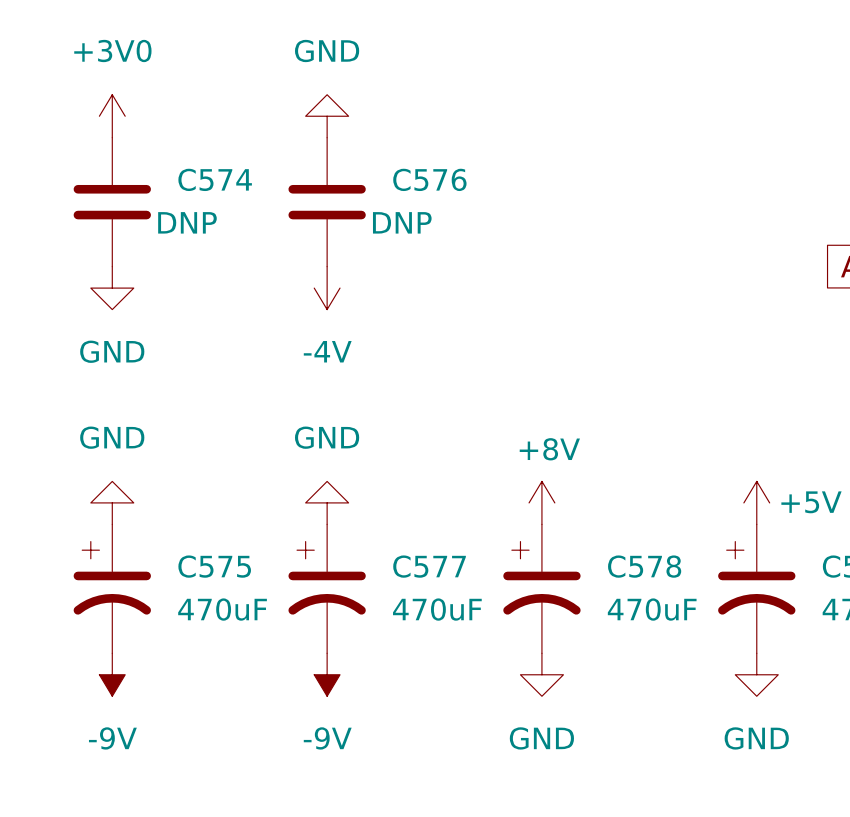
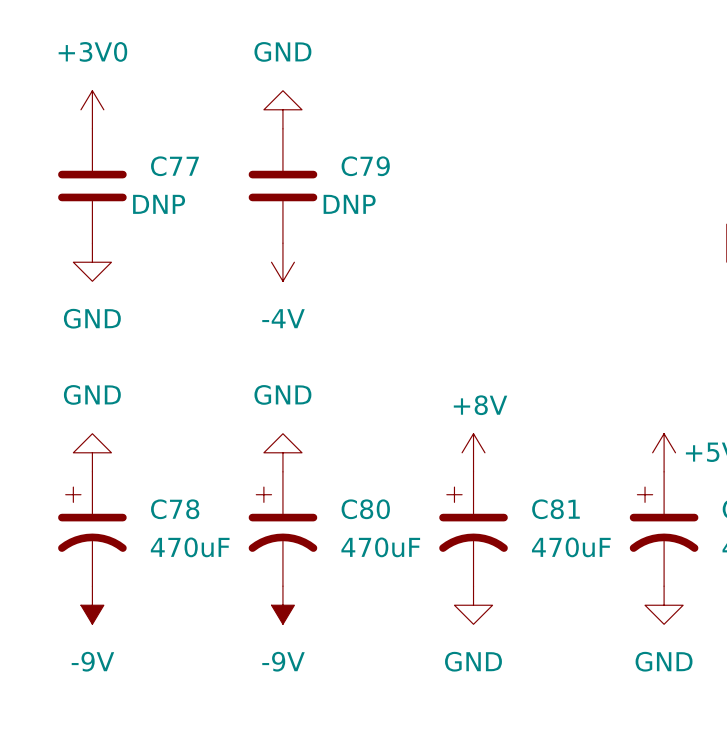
C574 name: C574 (215, 179) -> C77 (174, 166)
C576 name: C576 (429, 179) -> C79 (365, 166)
C575 name: C575 (214, 566) -> C78 (175, 509)
C577 name: C577 (429, 566) -> C80 (365, 509)
C578 name: C578 (644, 566) -> C81 (555, 509)

